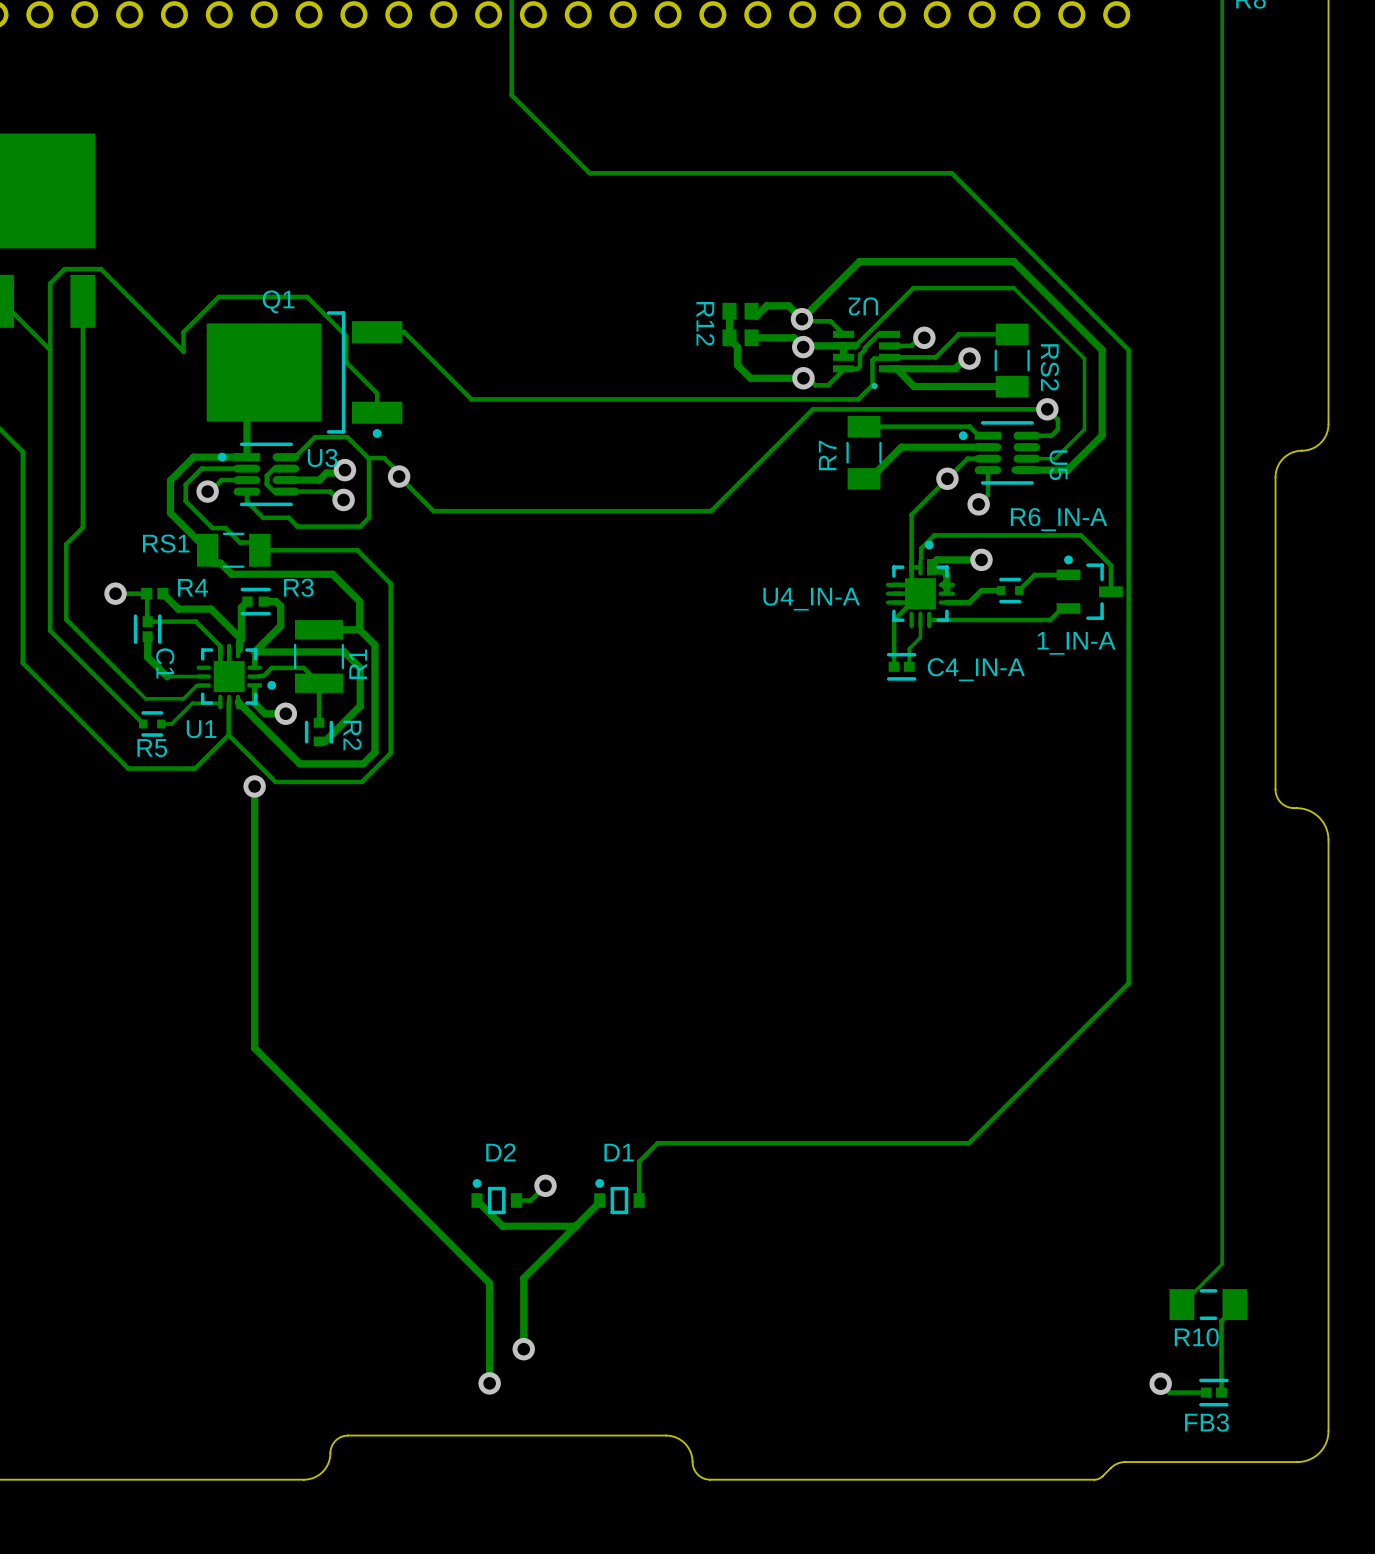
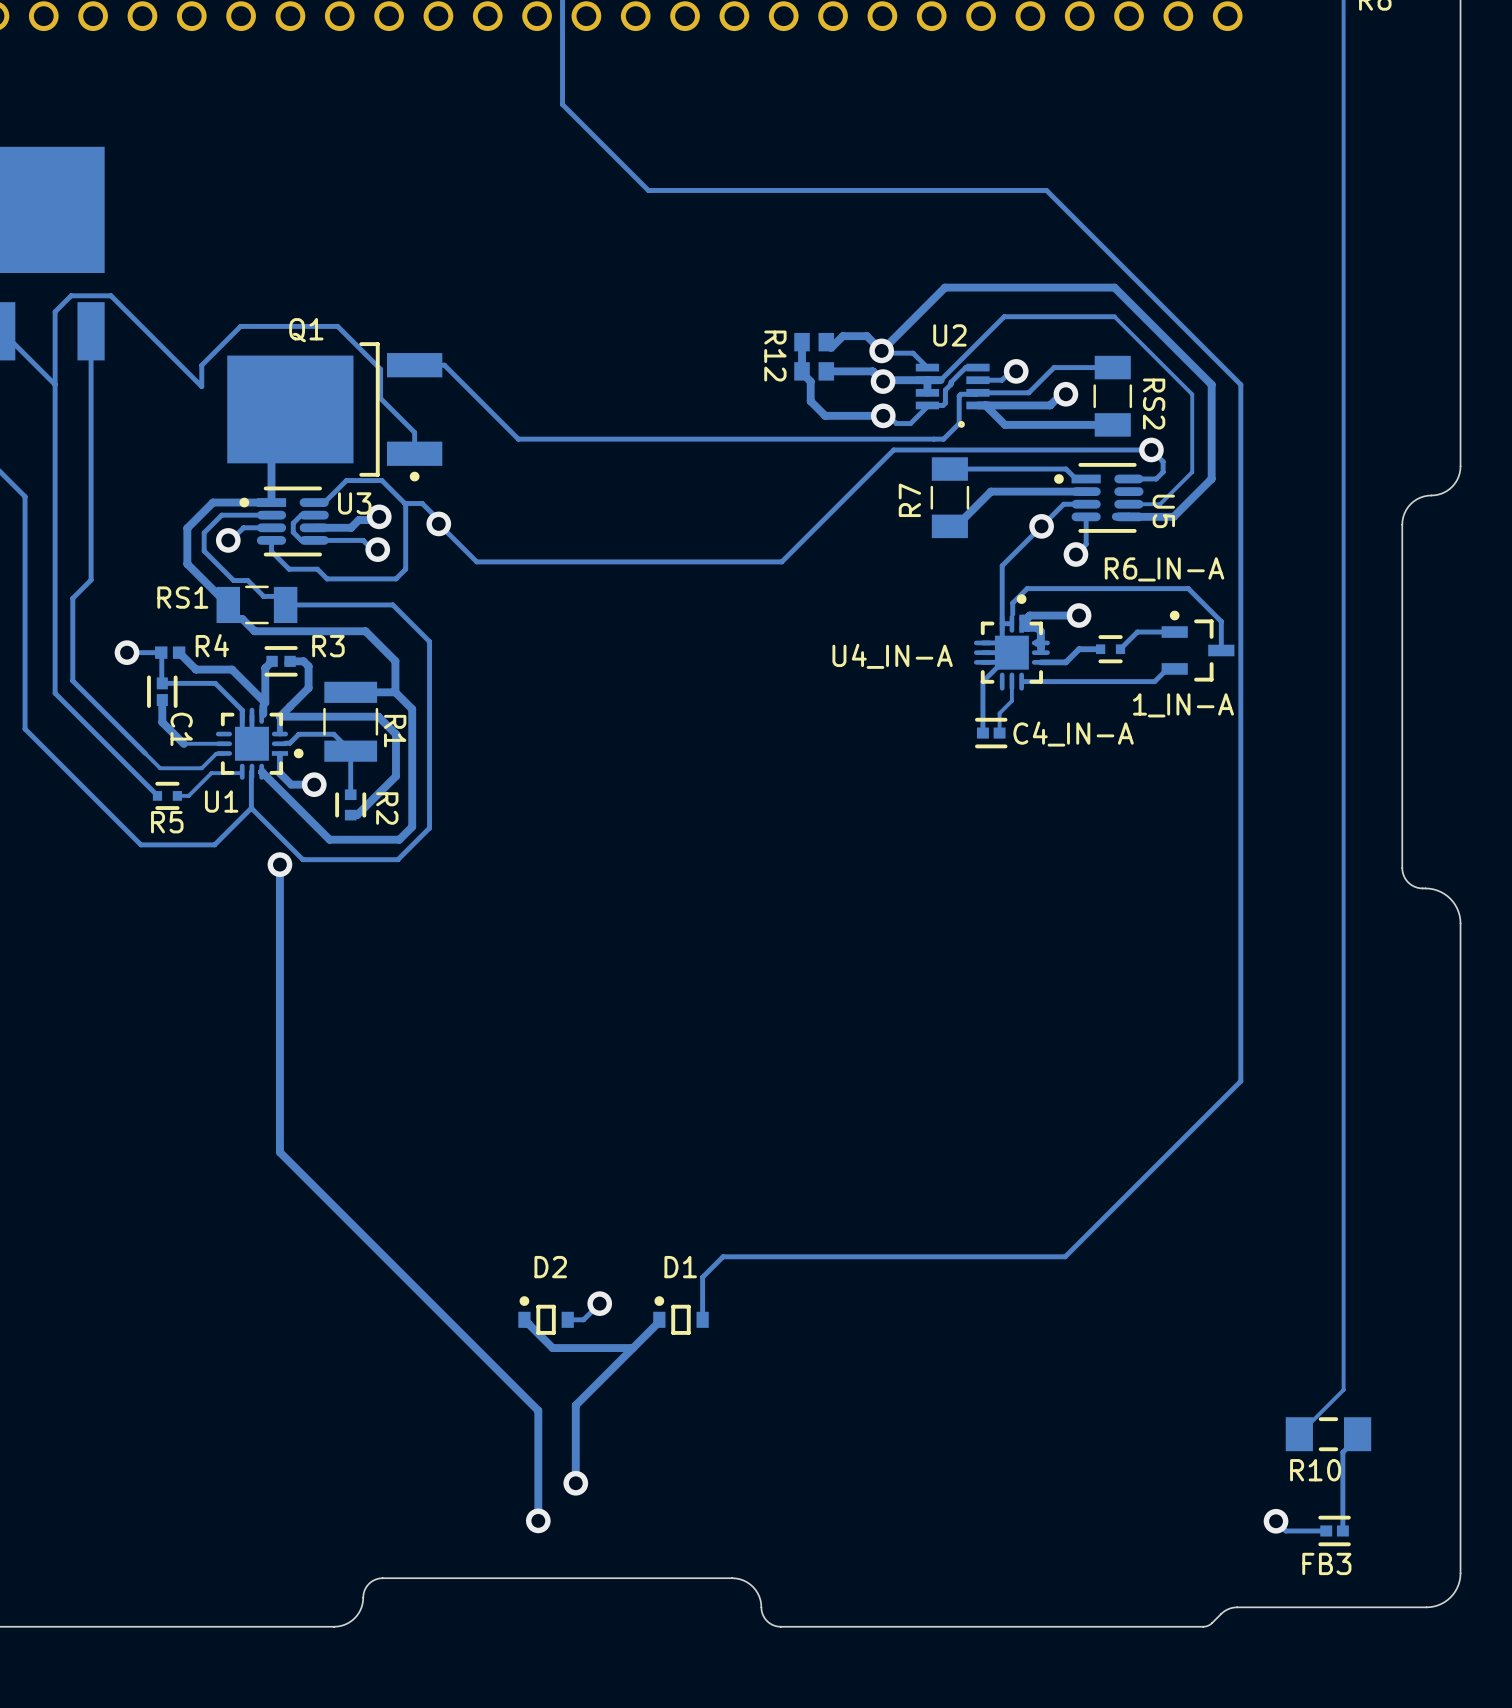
U2 name rotation: 0° (863, 306) -> 180° (949, 335)
R1 name rotation: 0° (358, 664) -> 180° (395, 731)

